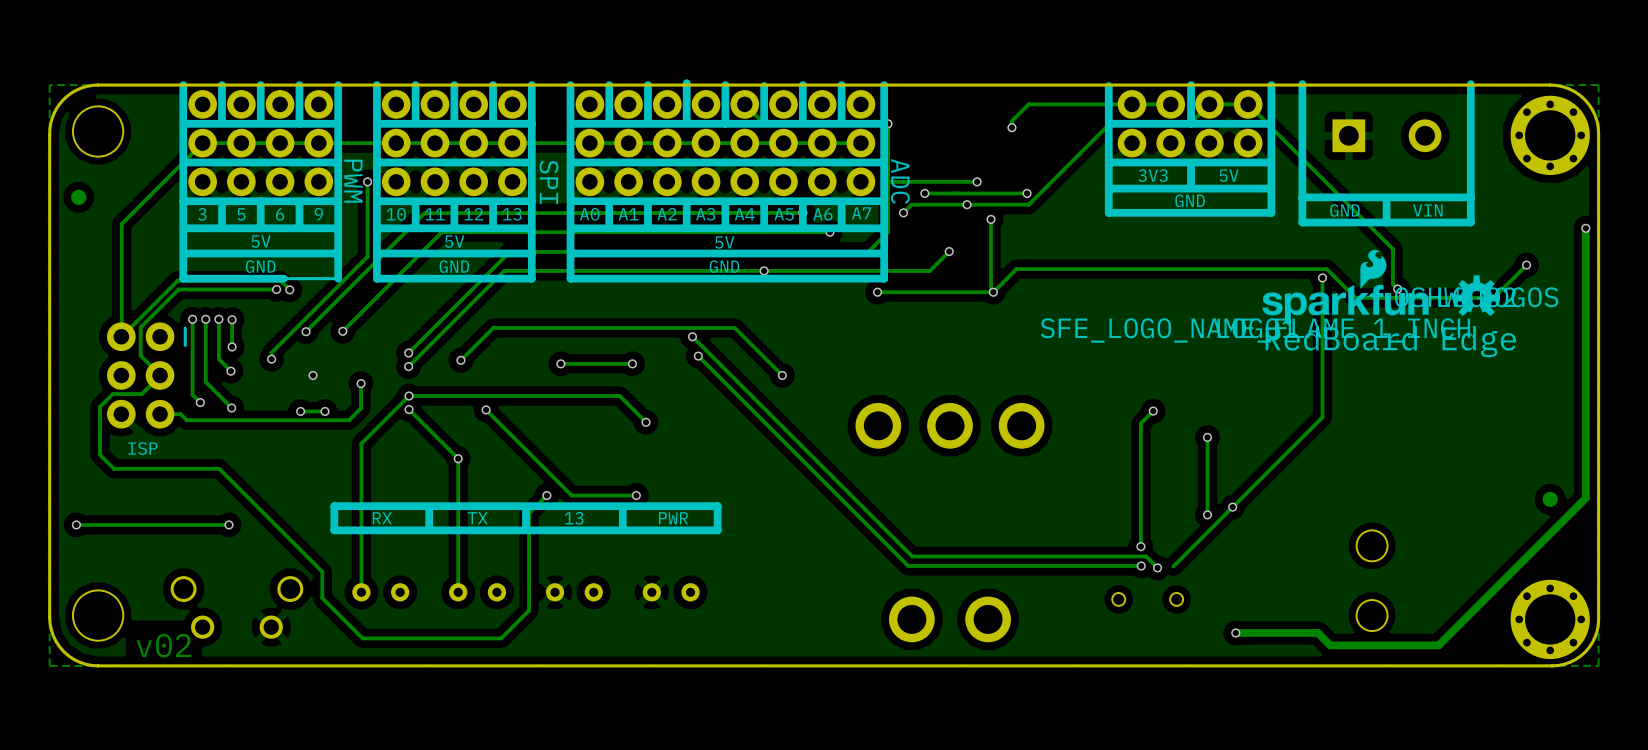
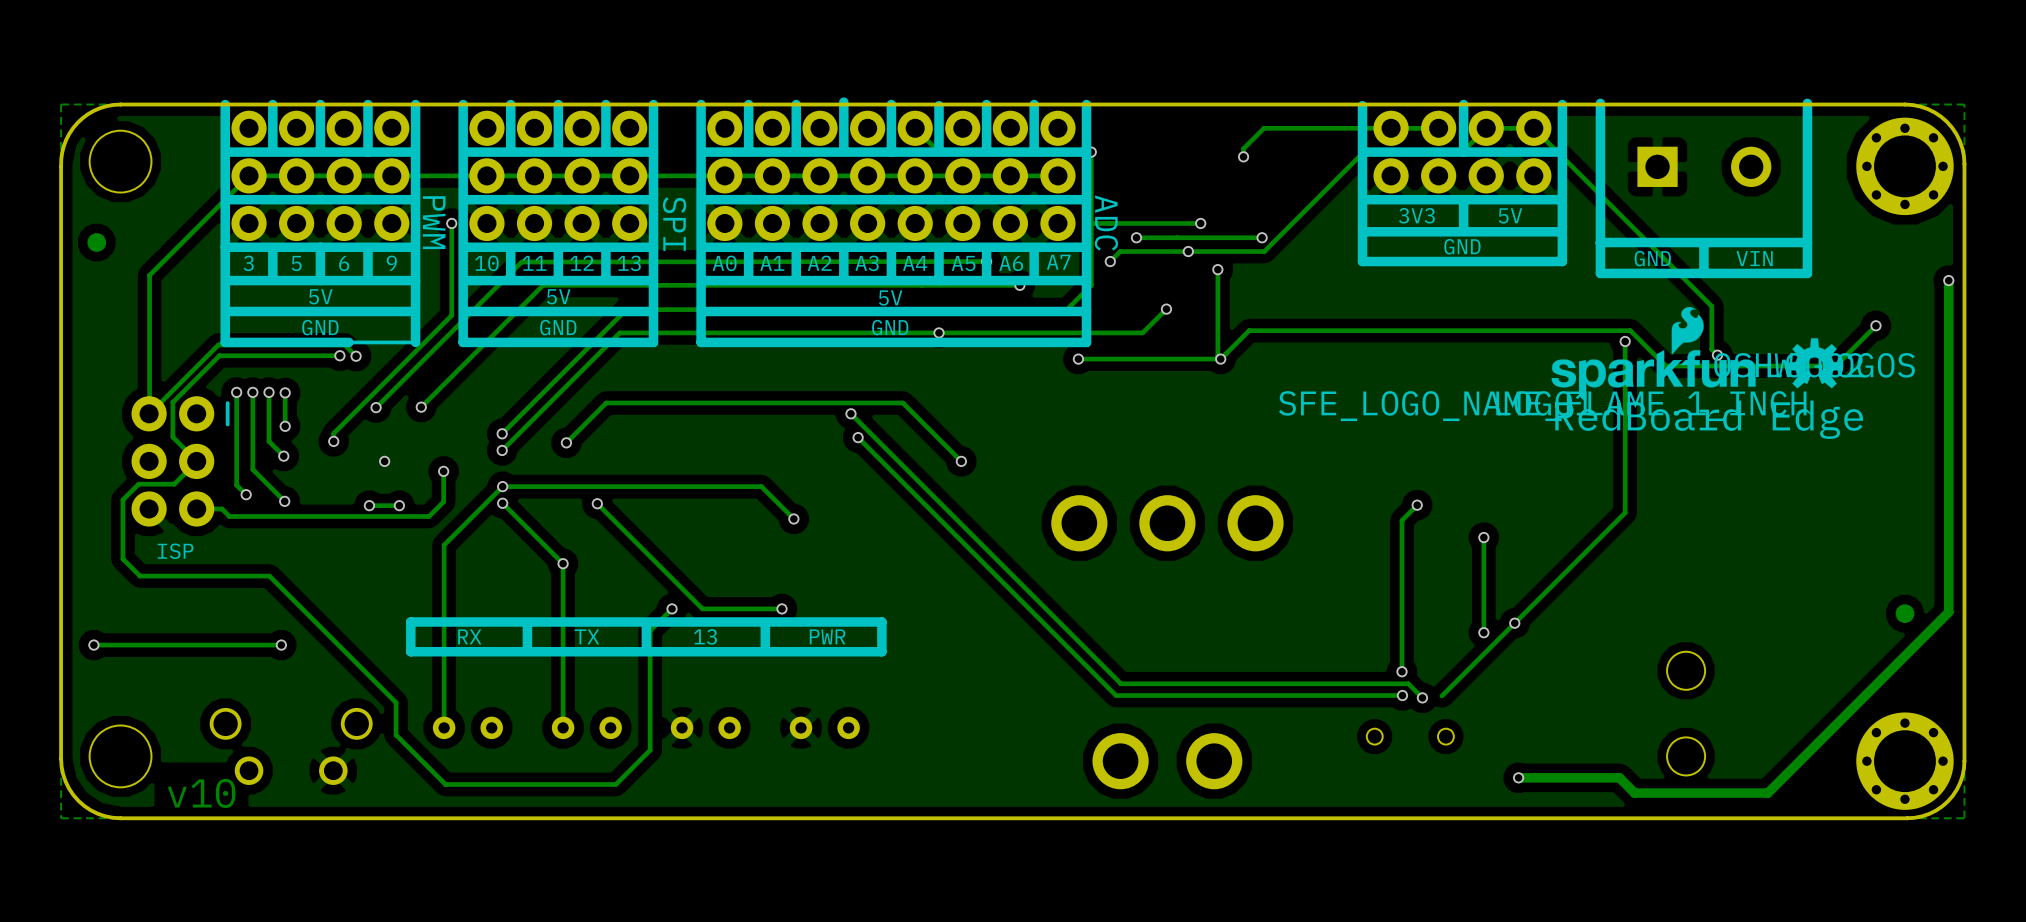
via: (560, 363) -> none
track: (632, 363) (560, 363) -> none
via: (632, 363) -> none
text: v02 (163, 645) -> v10 (201, 793)

